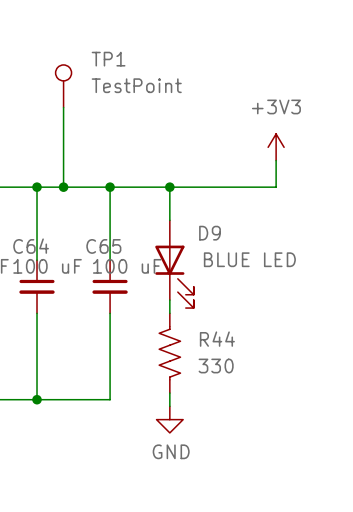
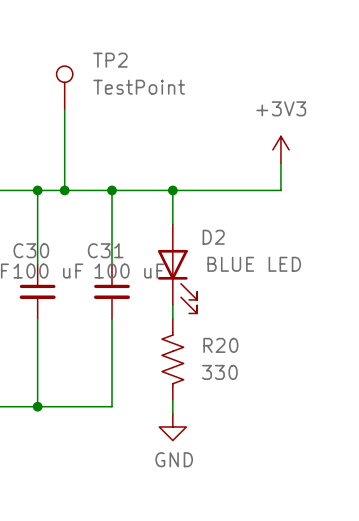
TP1 name: TP1 (108, 59) -> TP2 (110, 60)
D9 name: D9 (210, 233) -> D2 (213, 237)
C64 name: C64 (31, 246) -> C30 (31, 250)
C65 name: C65 (103, 246) -> C31 (105, 250)
R44 name: R44 (217, 339) -> R20 (220, 345)

